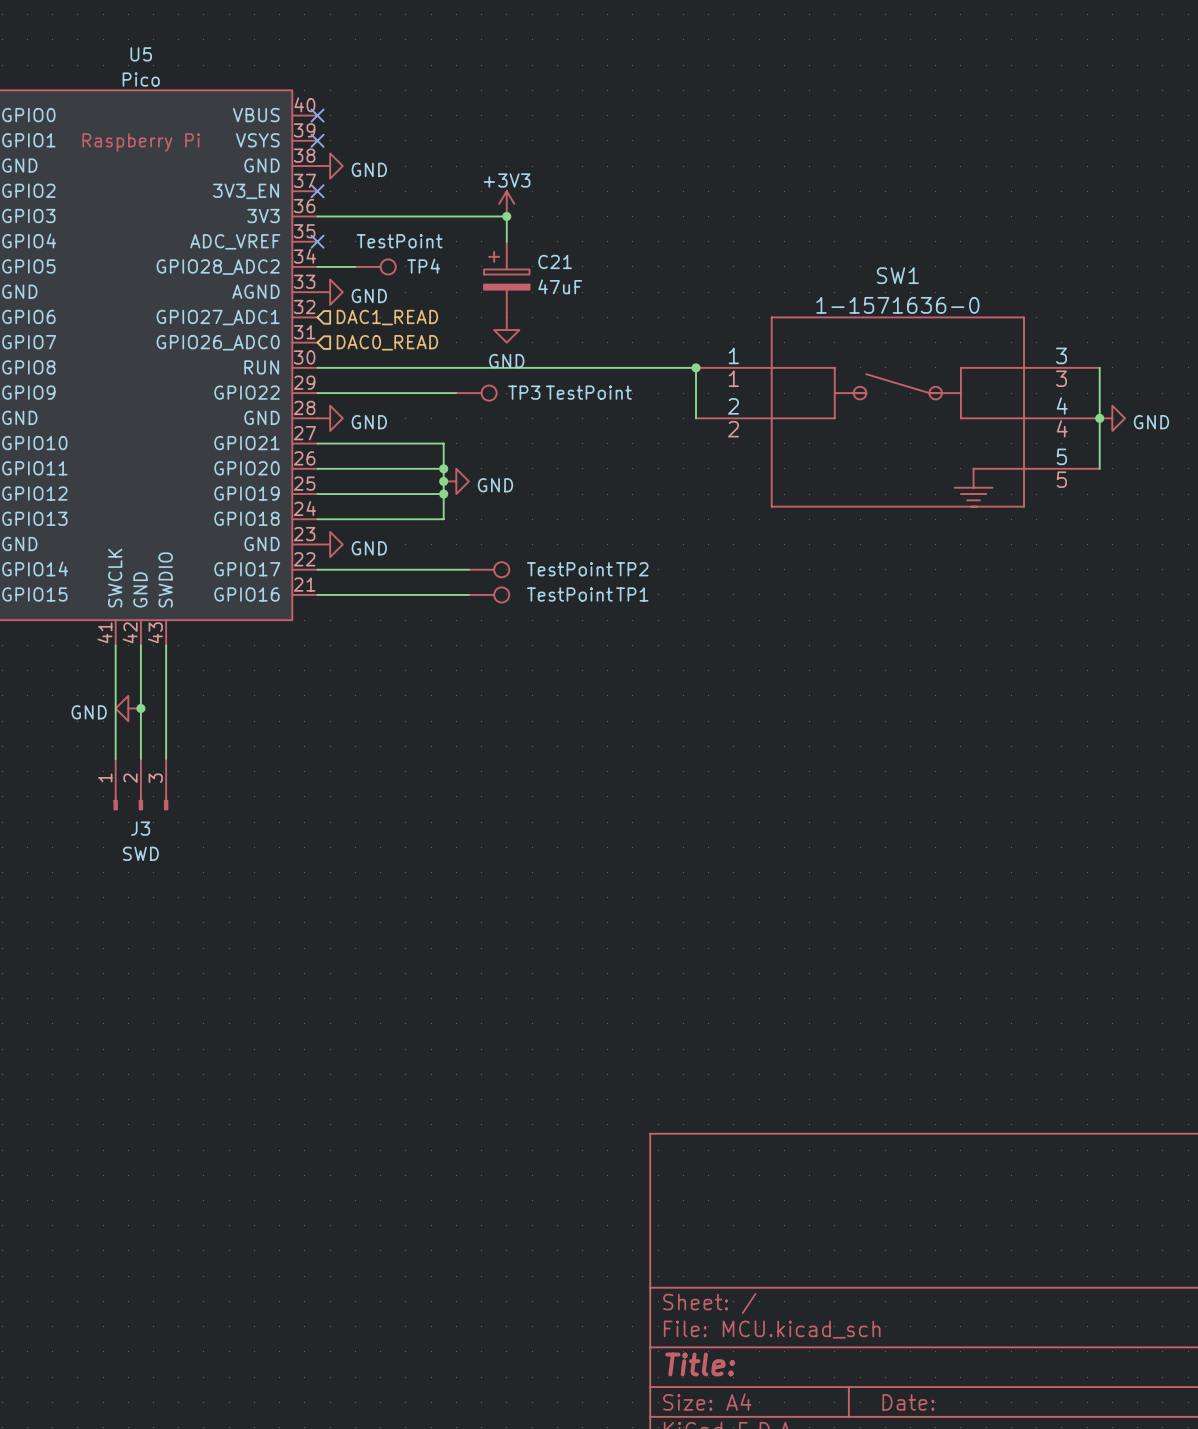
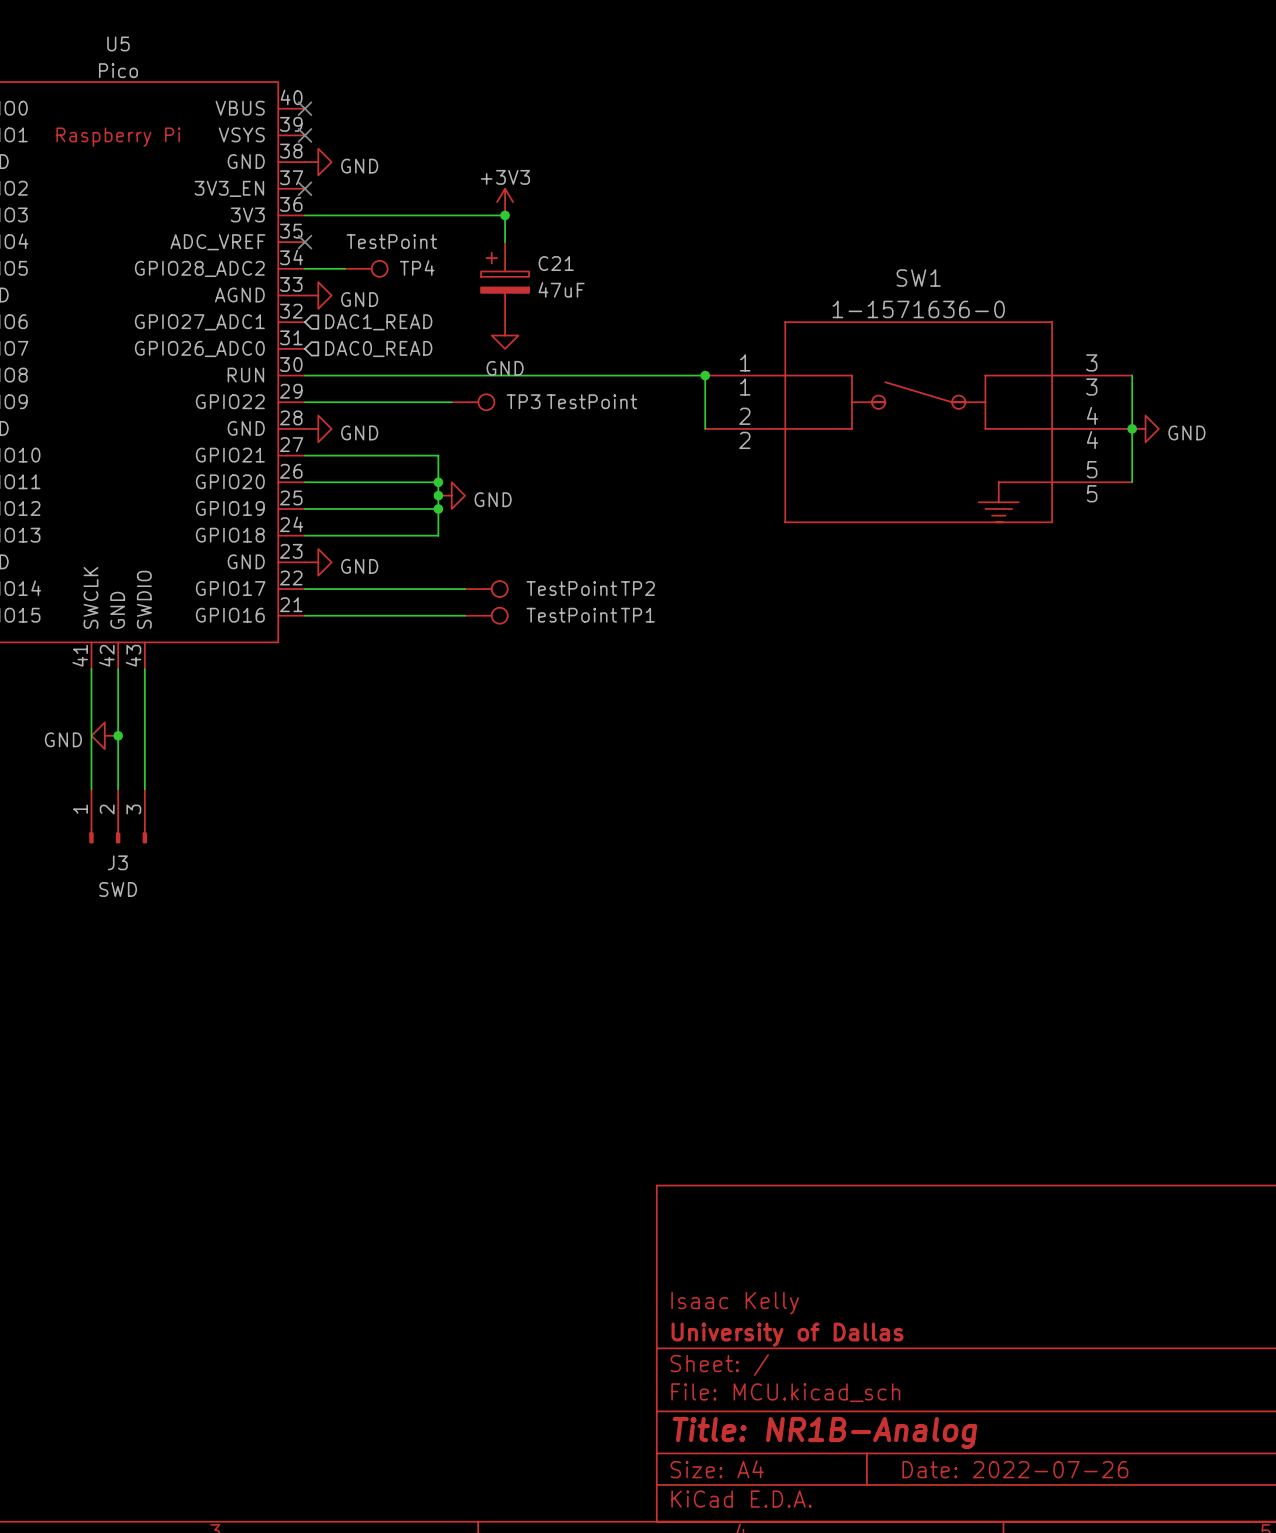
title block: none -> Isaac Kelly (735, 1303)
title block: none -> University of Dallas (787, 1334)
title block: Title: (700, 1364) -> Title: NR1B-Analog (824, 1433)
title block: Date: (908, 1402) -> Date: 2022-07-26 (1015, 1469)

